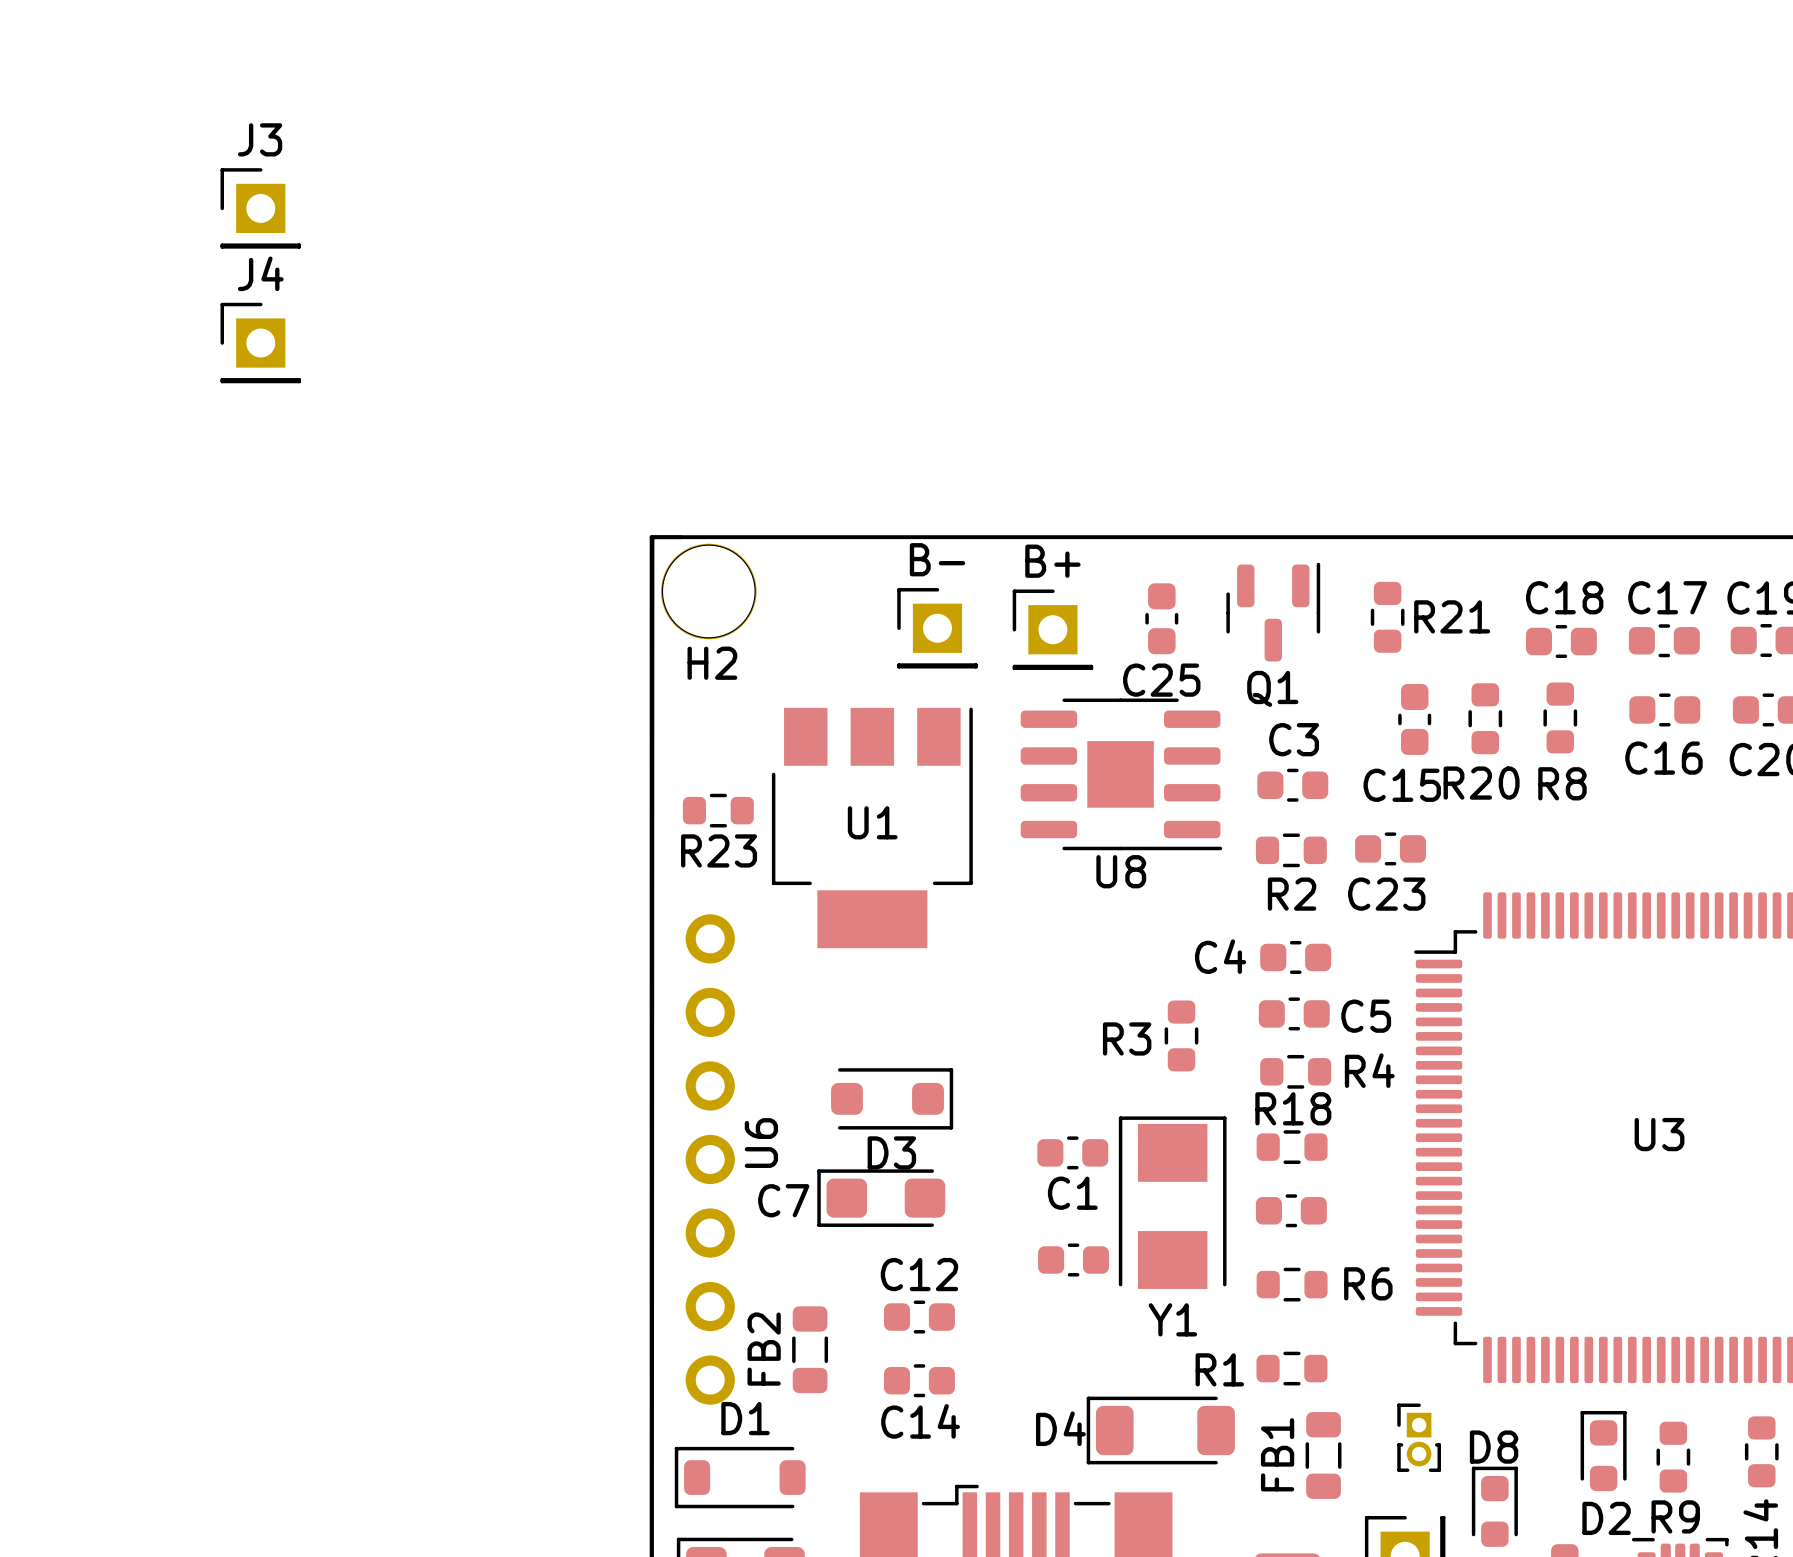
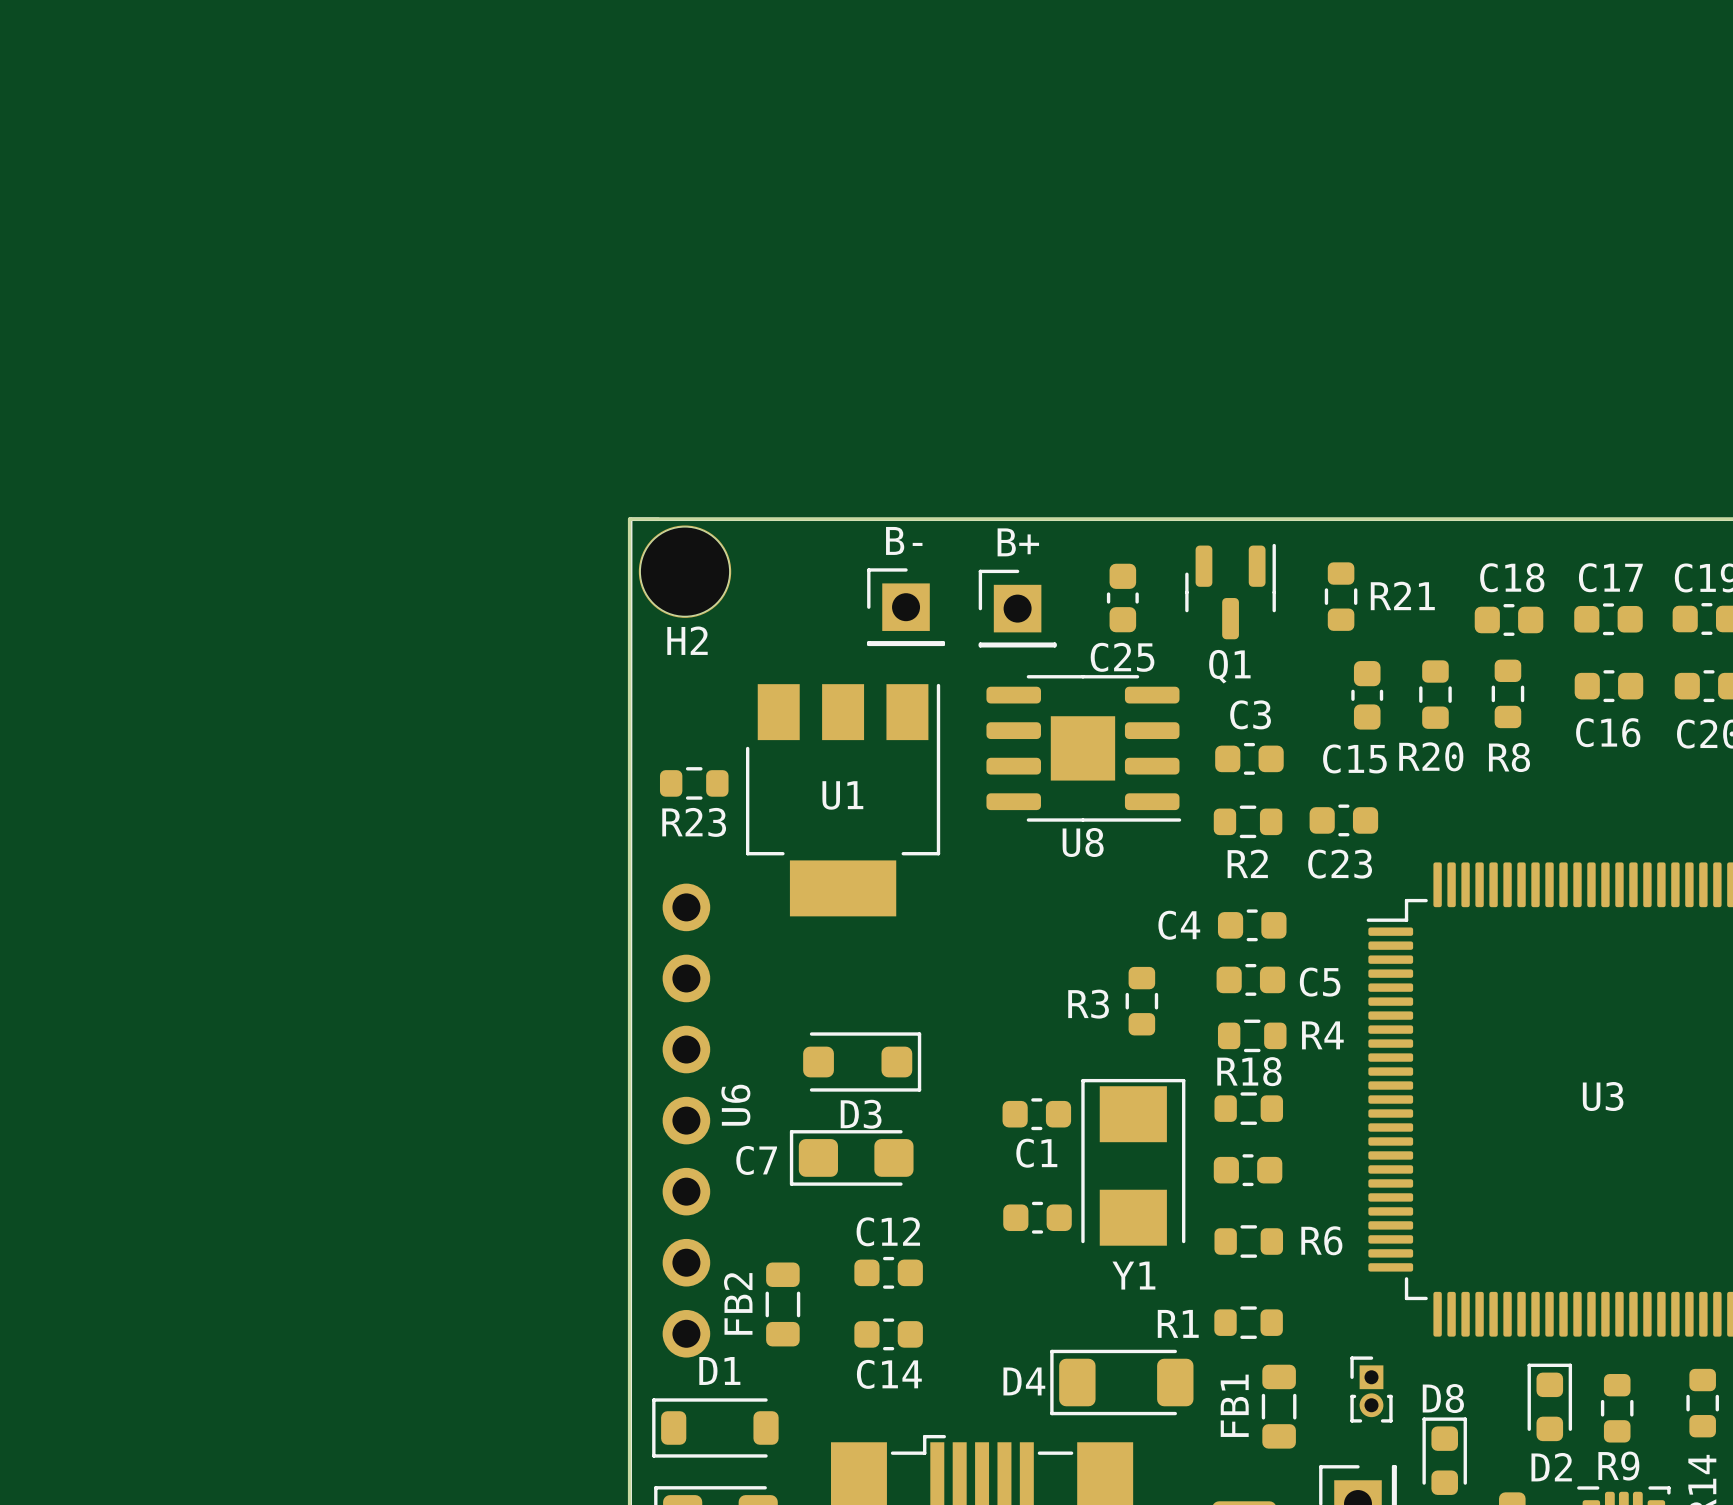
J3: (260, 208) -> none
J4: (260, 343) -> none

